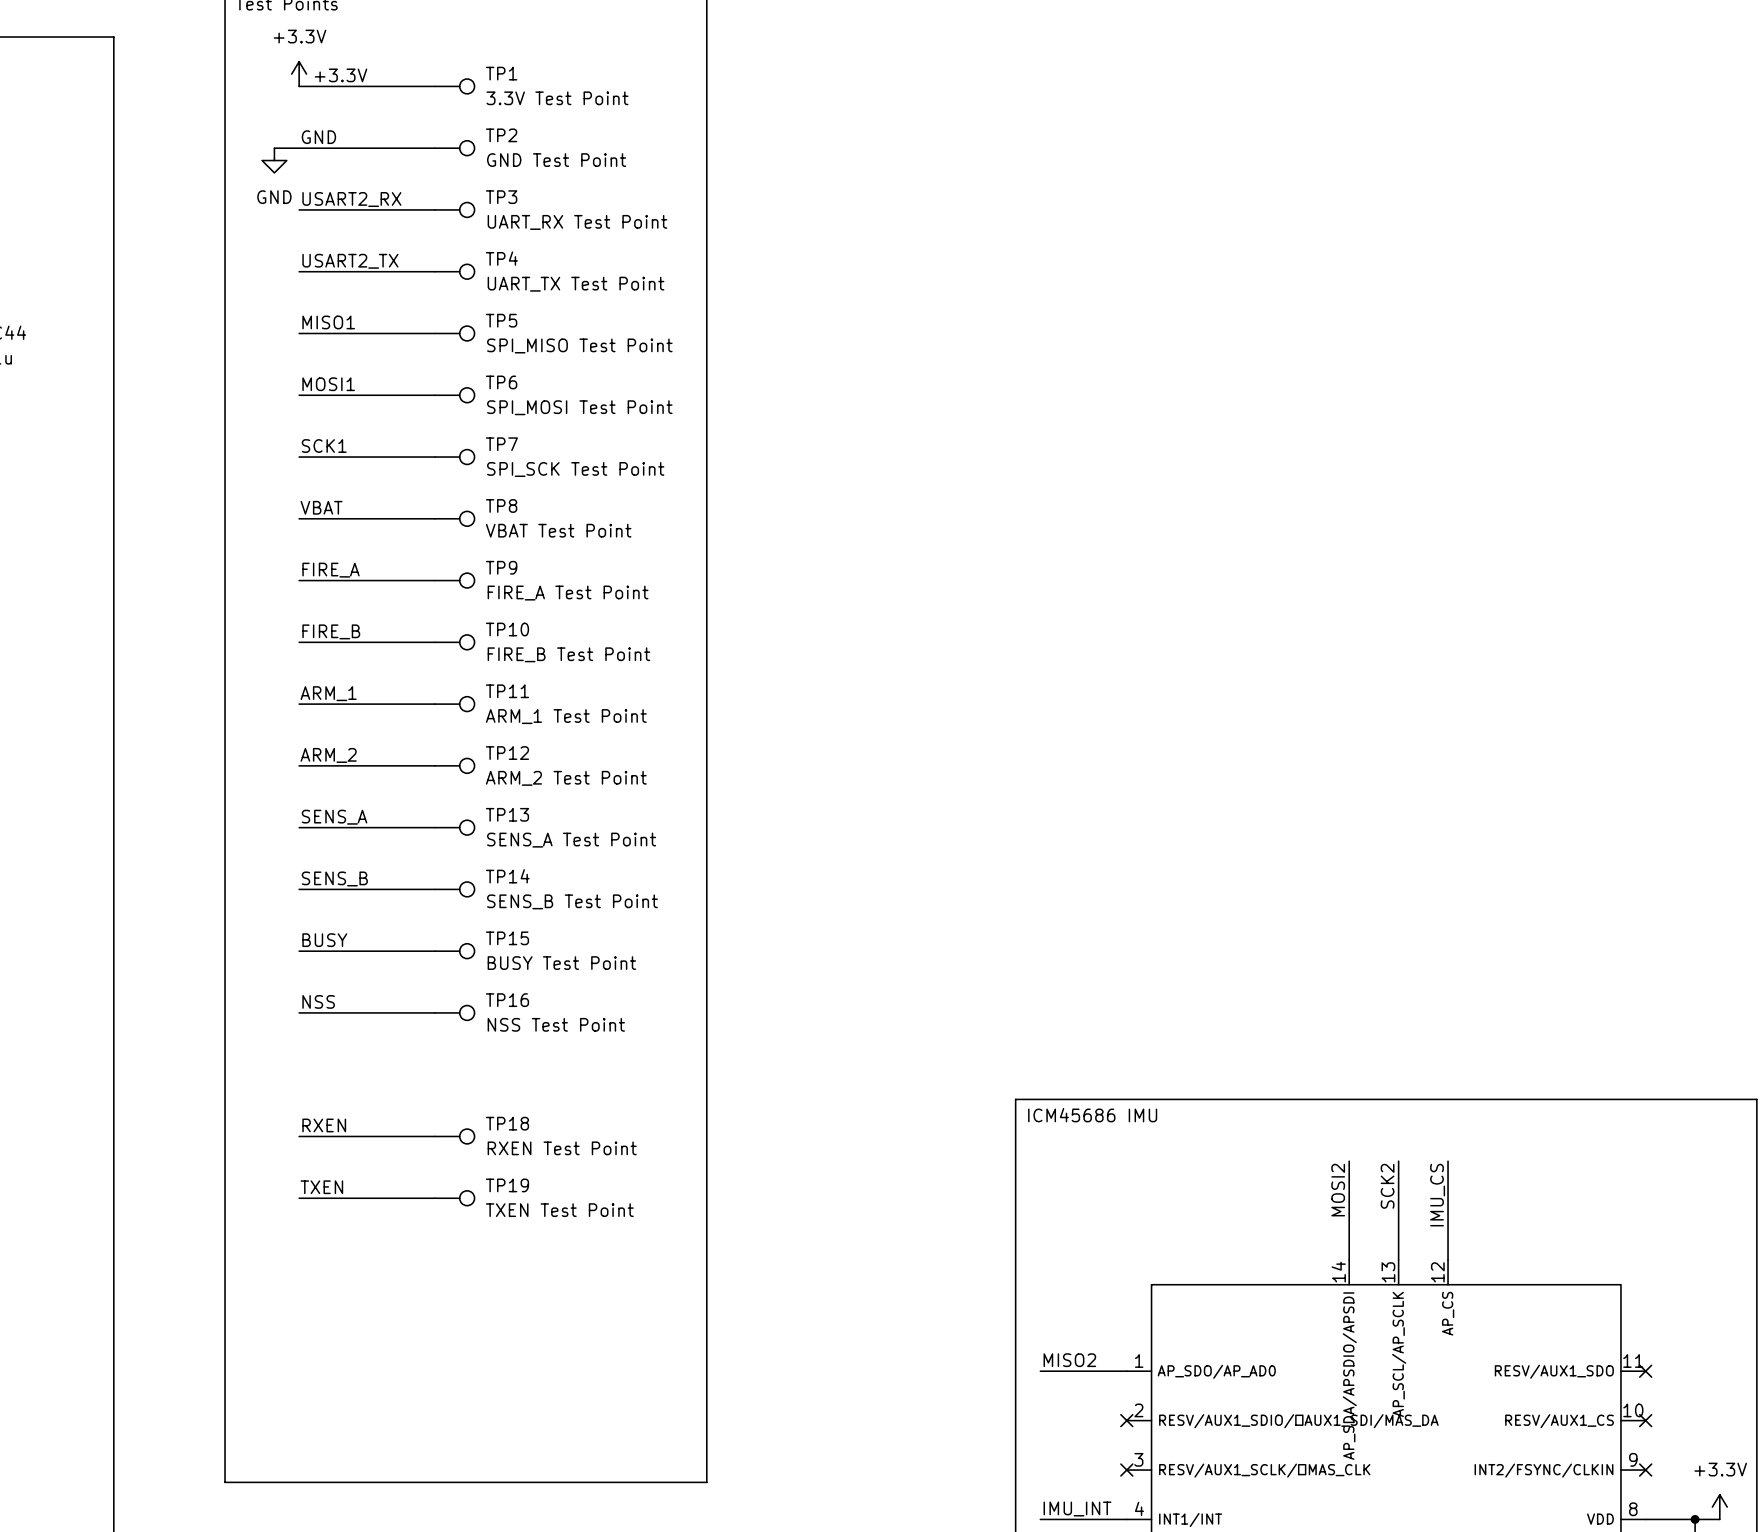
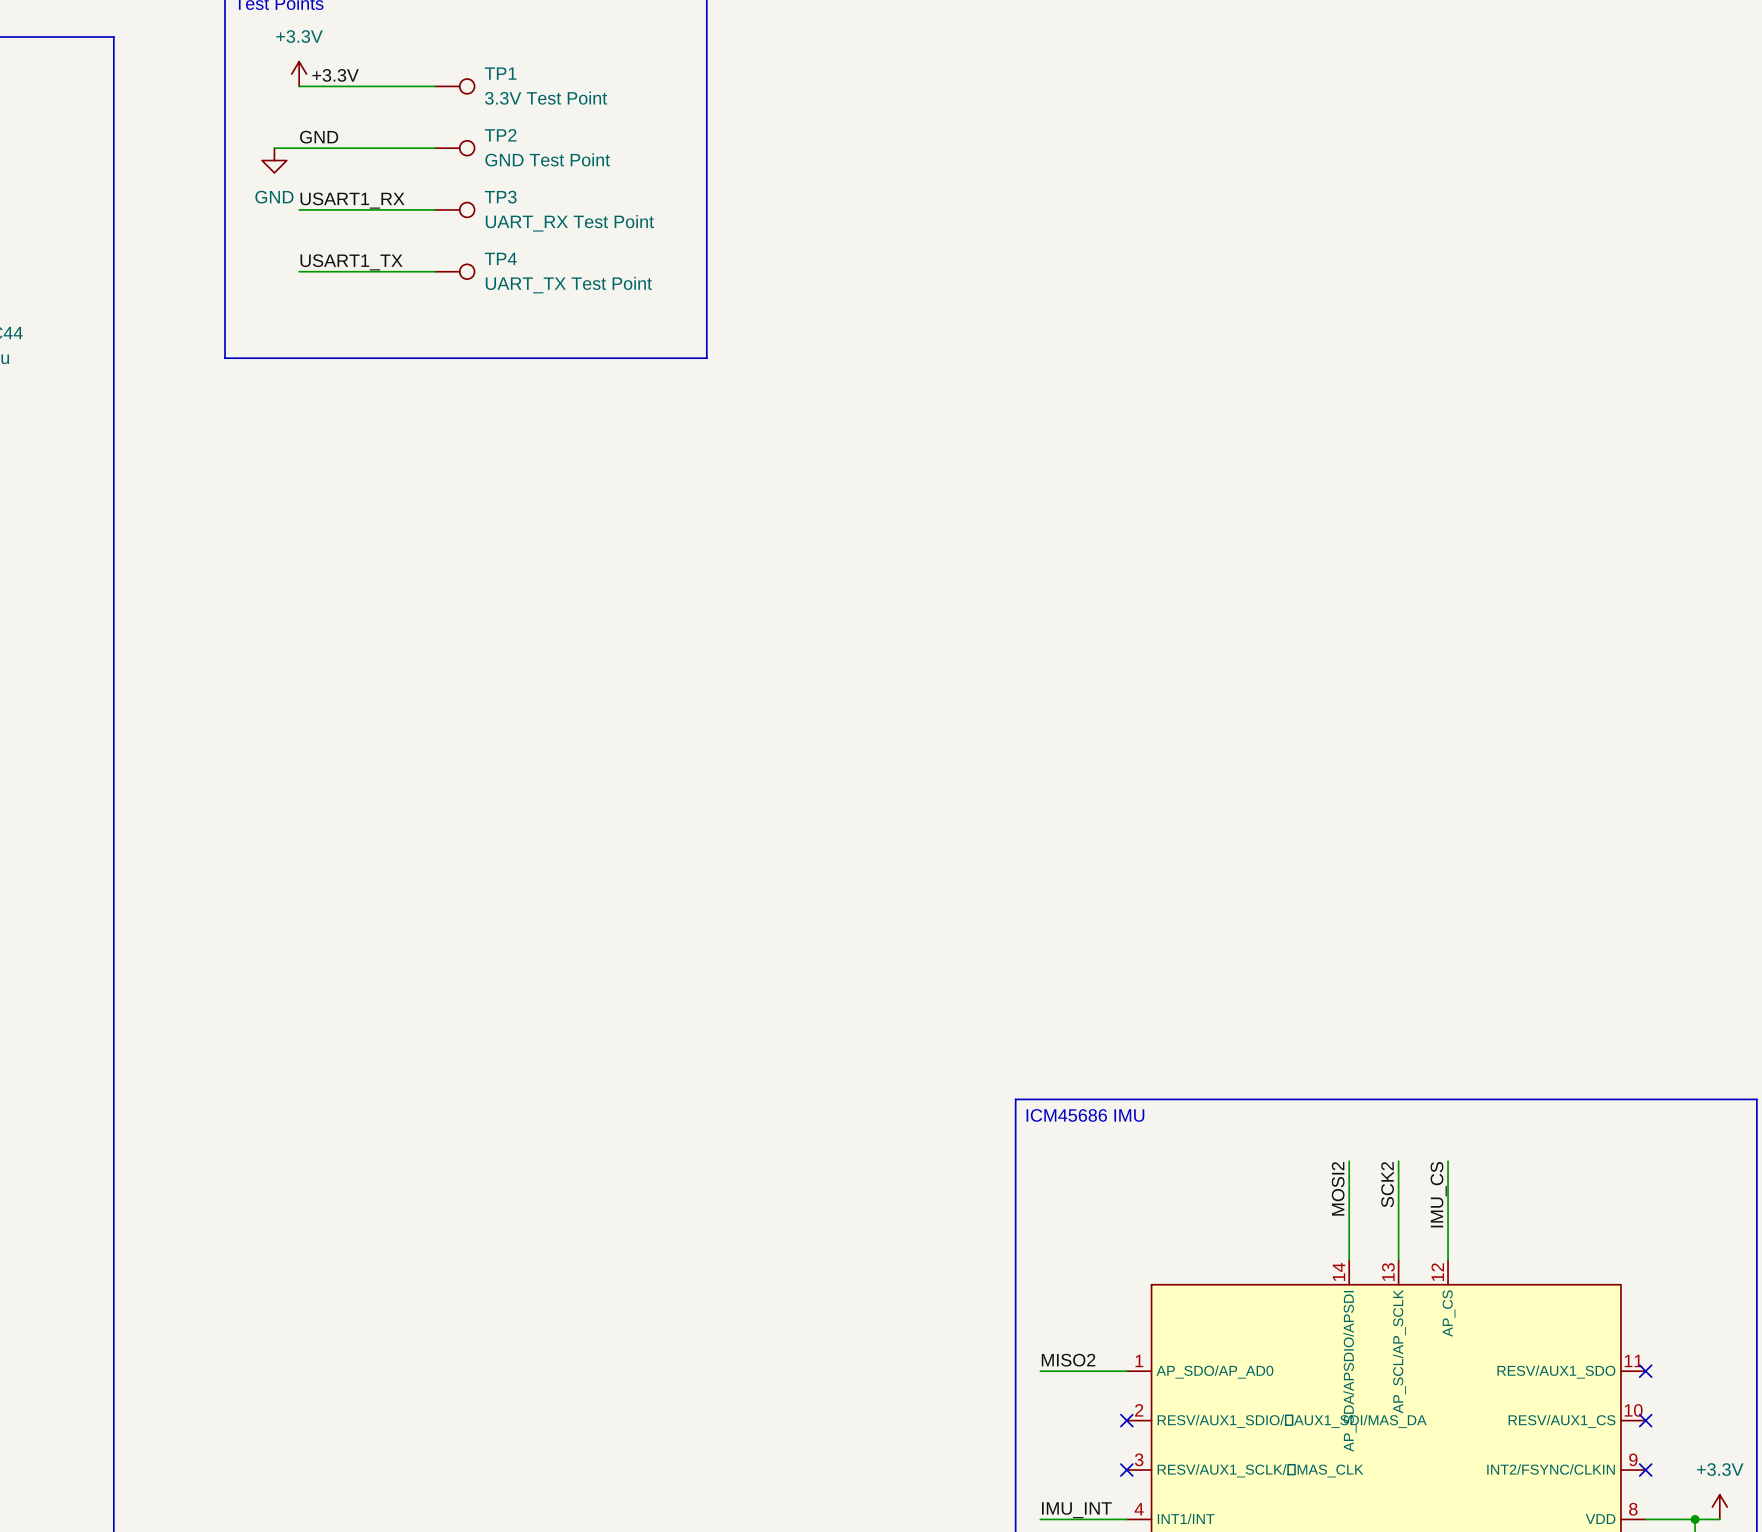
label: USART2_RX (351, 199) -> USART1_RX (352, 200)
label: USART2_TX (350, 261) -> USART1_TX (351, 262)
label: MISO1 (328, 322) -> none
wire: (299, 333) (435, 333) -> none
TP5: SPI_MISO Test Point (454, 333) -> none
line: (225, 358) (225, 1482) (706, 1482) (706, 358) -> (225, 358) (706, 358)
label: MOSI1 (328, 384) -> none
wire: (299, 395) (435, 395) -> none
TP6: SPI_MOSI Test Point (454, 395) -> none
label: SCK1 (324, 446) -> none
wire: (299, 457) (435, 457) -> none
TP7: SPI_SCK Test Point (454, 457) -> none
label: VBAT (321, 507) -> none
wire: (299, 518) (435, 518) -> none
TP8: VBAT Test Point (454, 518) -> none
label: FIRE_A (330, 570) -> none
wire: (299, 580) (435, 580) -> none
TP9: FIRE_A Test Point (454, 580) -> none
label: FIRE_B (331, 631) -> none
wire: (299, 642) (435, 642) -> none
TP10: FIRE_B Test Point (454, 642) -> none
label: ARM_1 (328, 693) -> none
wire: (299, 704) (435, 704) -> none
TP11: ARM_1 Test Point (454, 704) -> none
label: ARM_2 (328, 755) -> none
wire: (299, 765) (435, 765) -> none
TP12: ARM_2 Test Point (454, 765) -> none
label: SENS_A (334, 817) -> none
wire: (299, 827) (435, 827) -> none
TP13: SENS_A Test Point (454, 827) -> none
label: SENS_B (334, 878) -> none
wire: (299, 889) (435, 889) -> none
TP14: SENS_B Test Point (454, 889) -> none
label: BUSY (324, 940) -> none
wire: (299, 951) (435, 951) -> none
TP15: BUSY Test Point (454, 951) -> none
label: NSS (318, 1001) -> none
wire: (299, 1012) (435, 1012) -> none
TP16: NSS Test Point (454, 1012) -> none
label: RXEN (324, 1125) -> none
wire: (299, 1136) (435, 1136) -> none
TP18: RXEN Test Point (454, 1136) -> none
label: TXEN (321, 1187) -> none
wire: (299, 1198) (435, 1198) -> none
TP19: TXEN Test Point (454, 1198) -> none

